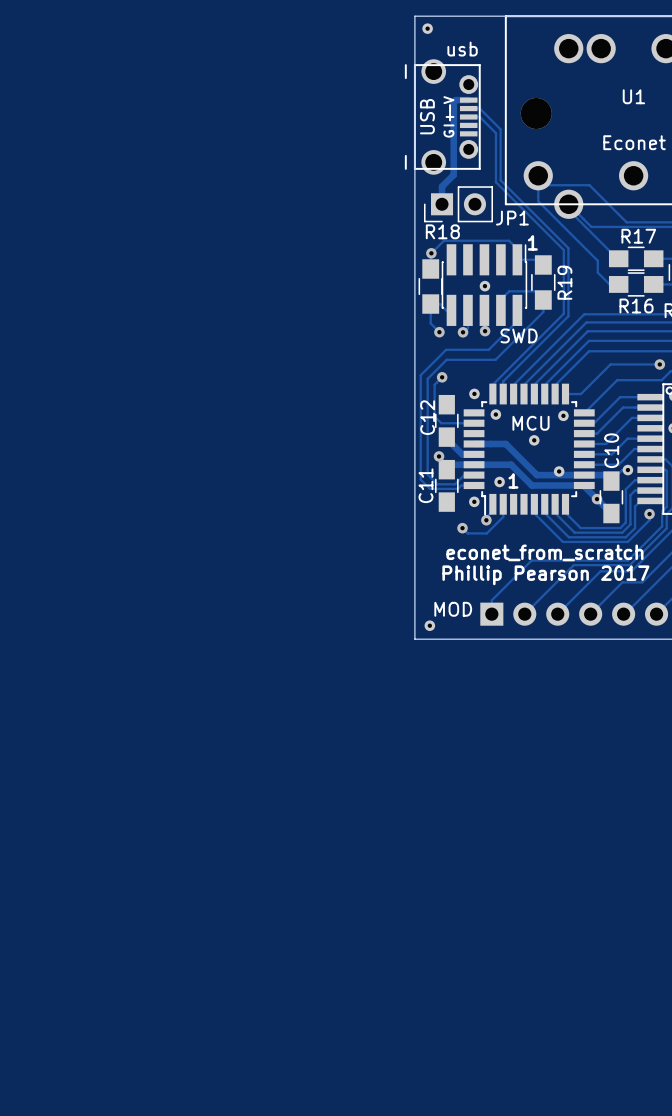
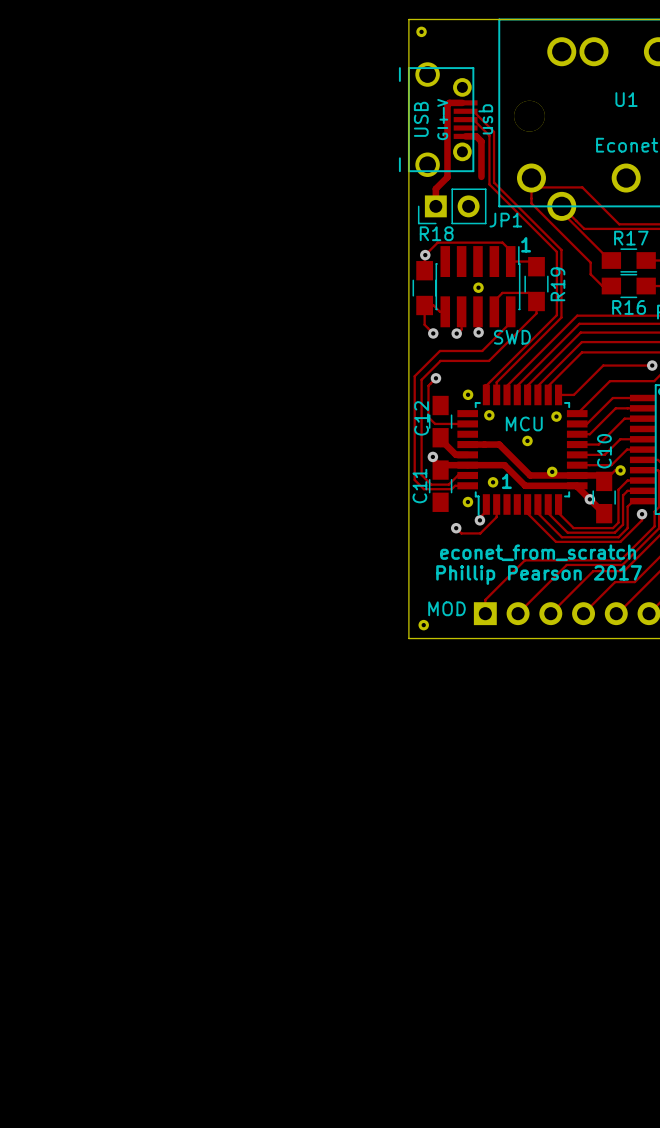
USB value rotation: 0° (462, 49) -> 90° counterclockwise (485, 119)
USB value position: usb (462, 49) -> usb (485, 119)
USB footprint: [404, 59, 481, 175] -> [398, 62, 478, 177]
track: none -> (465, 136) (476, 136) (481, 141) (481, 176)

